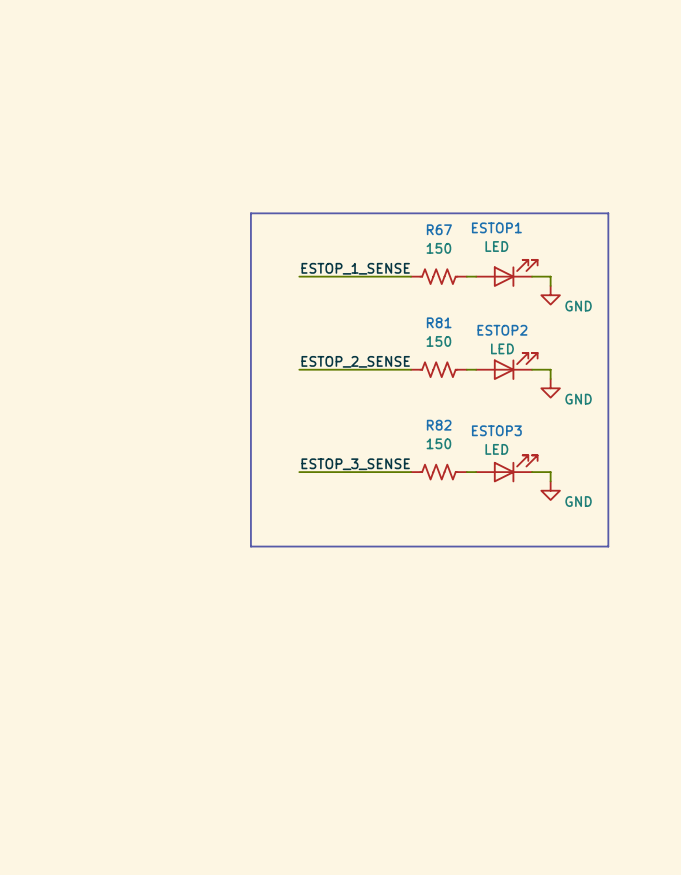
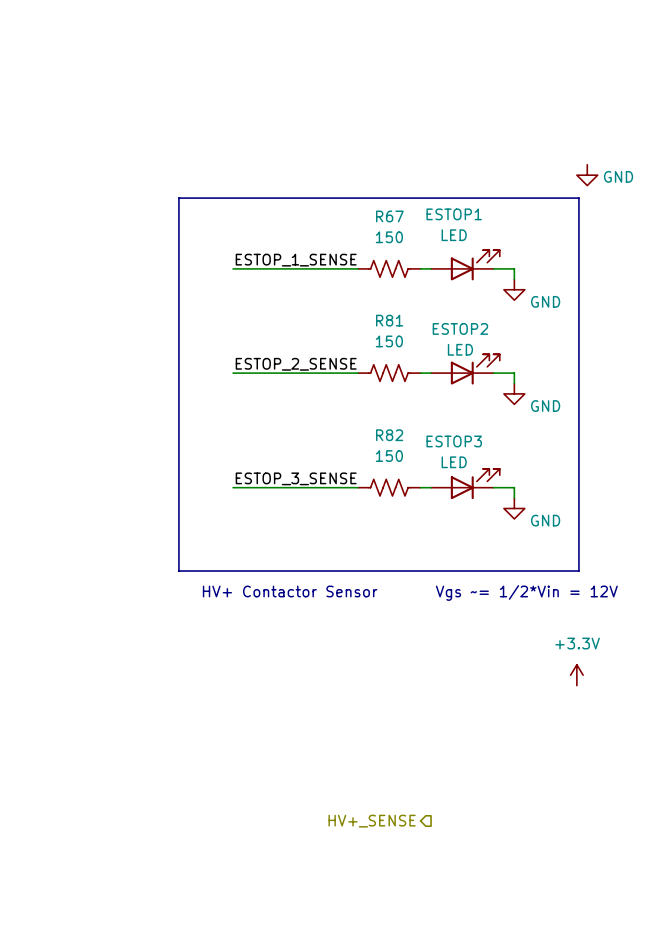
power symbol: none -> GND (587, 175)
text: none -> HV+ Contactor Sensor (290, 591)
text: none -> Vgs ~= 1/2*Vin = 12V (526, 592)
power symbol: none -> +3.3V (576, 675)
hierarchical label: none -> HV+_SENSE (372, 821)

